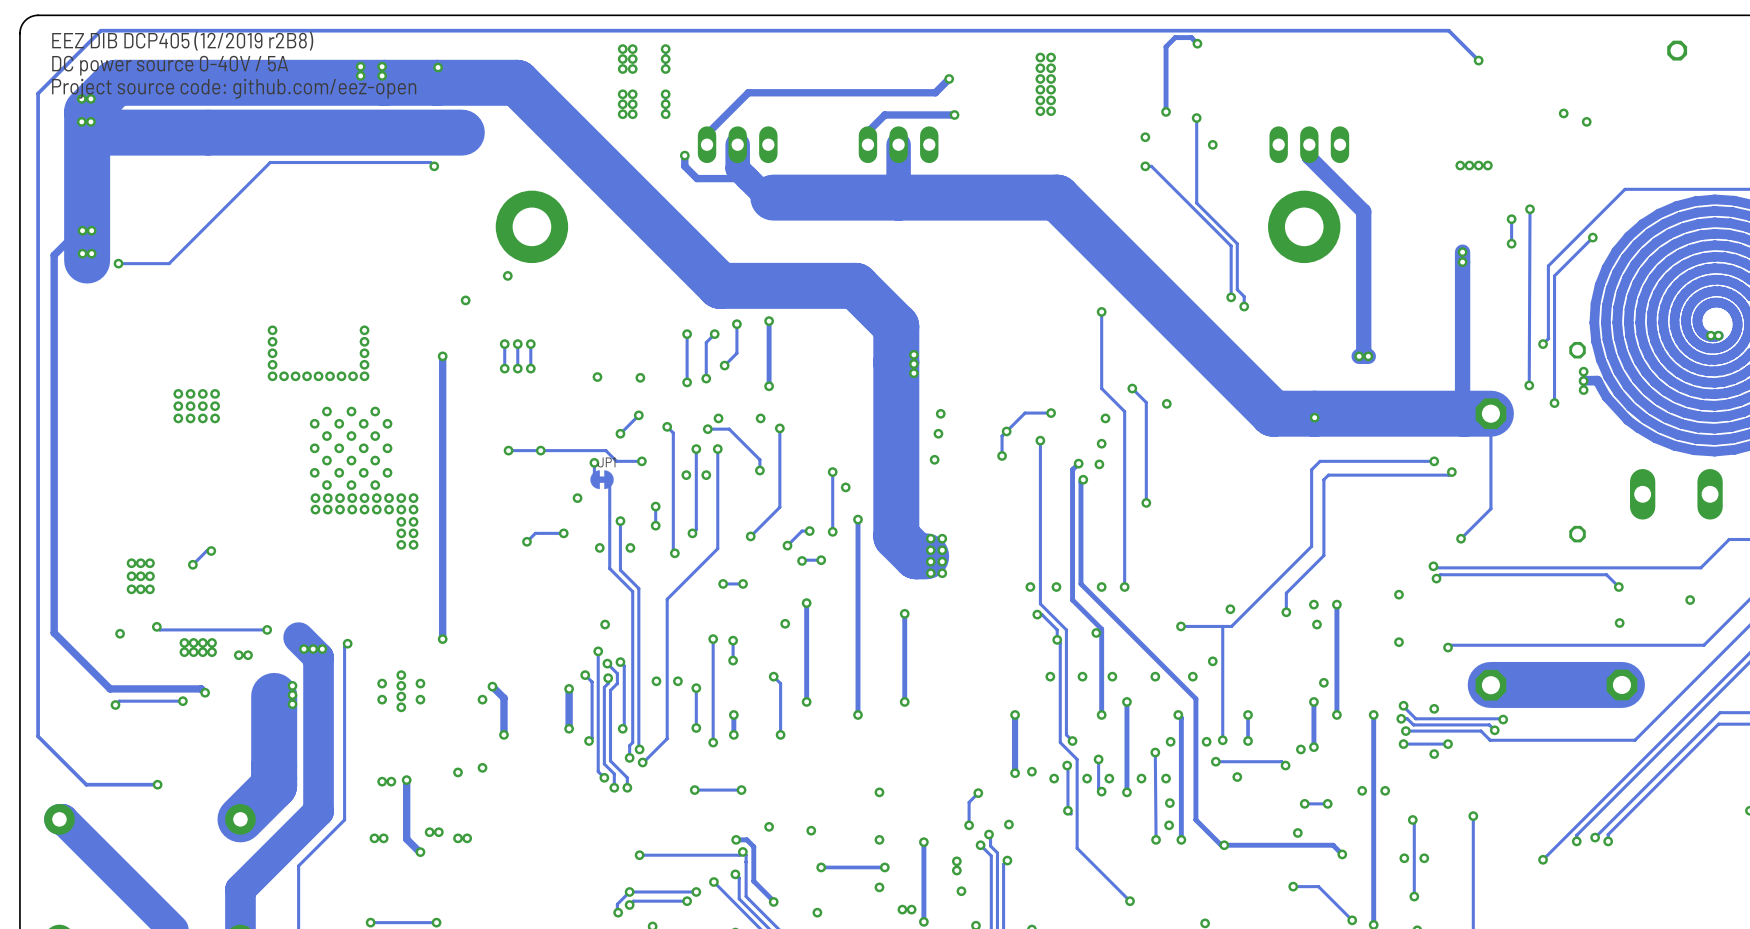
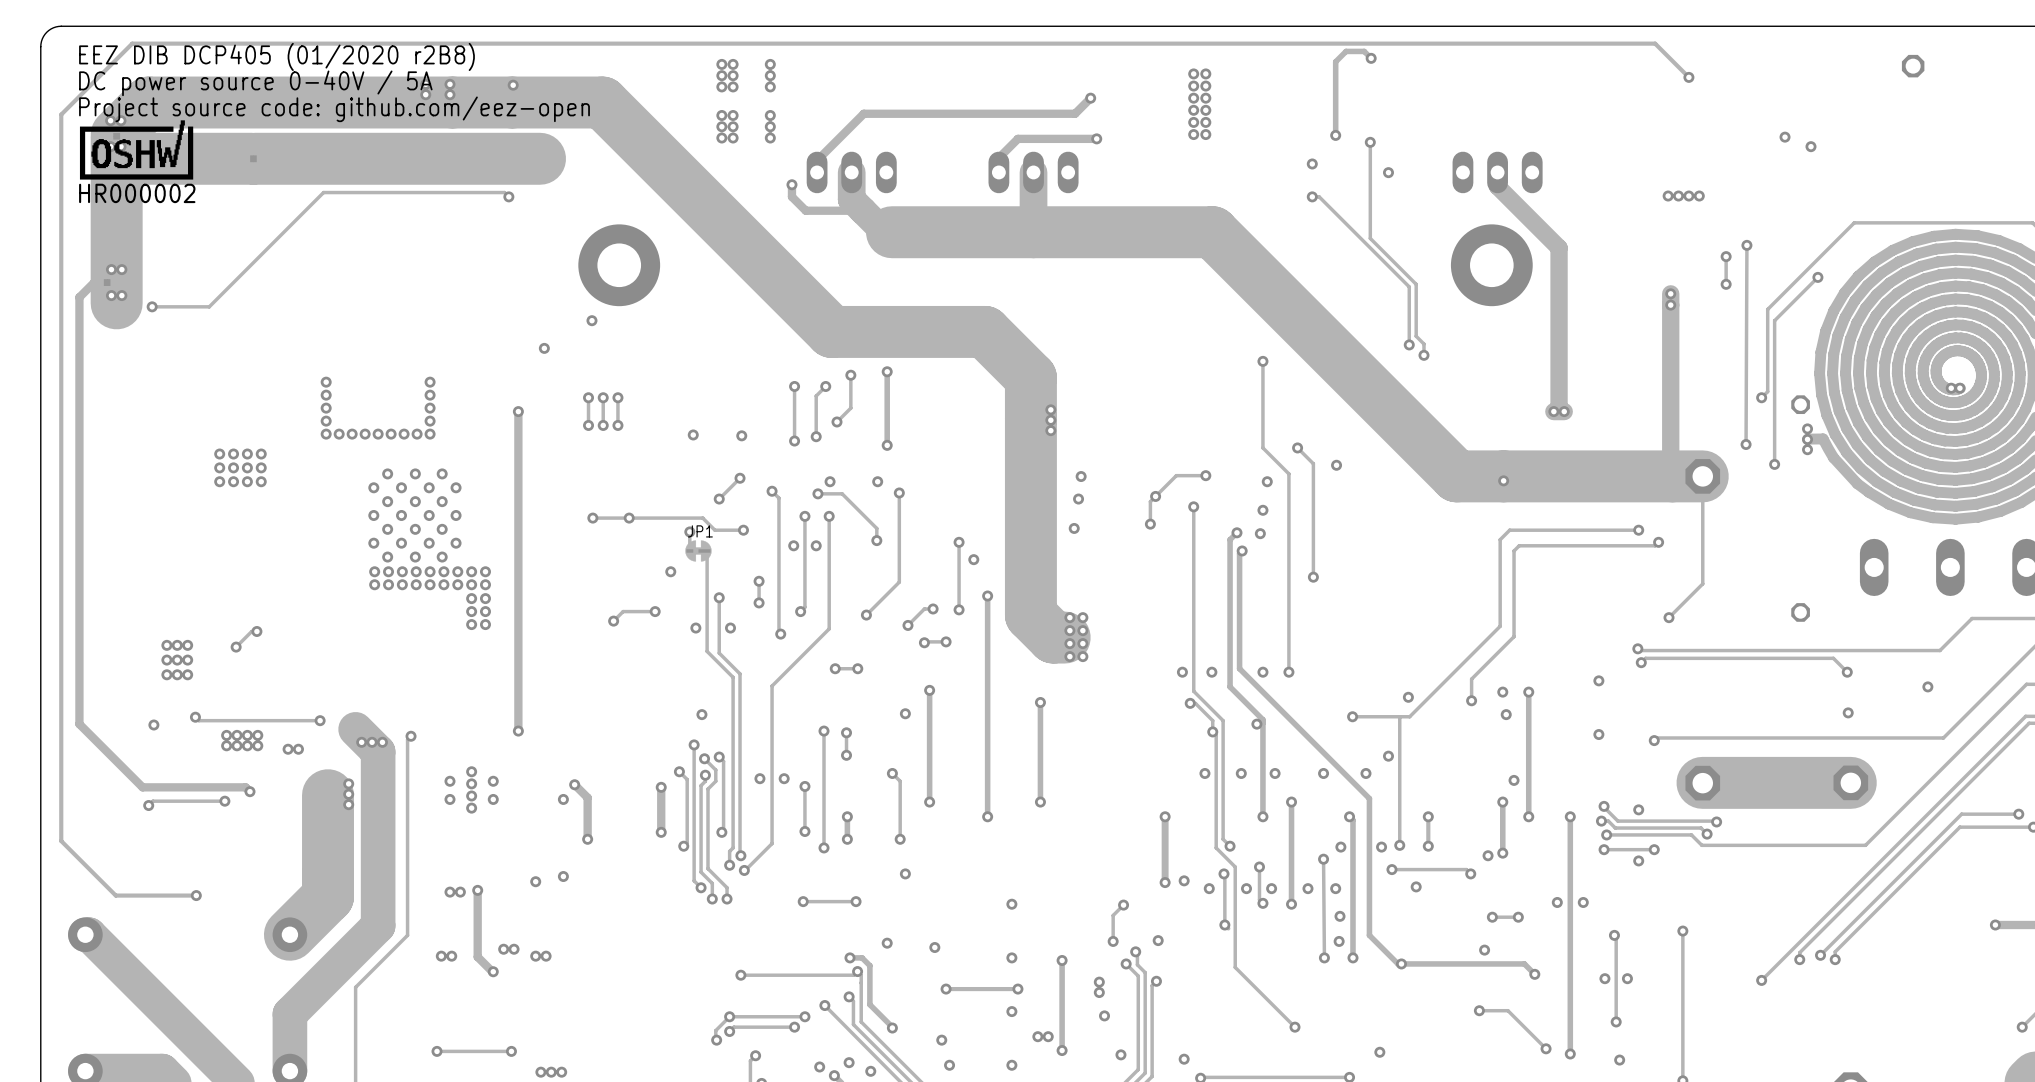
text: EEZ DIB DCP405 (12/2019 r2B8) (182, 41) -> EEZ DIB DCP405 (01/2020 r2B8) (276, 56)
drawing: none -> [79, 120, 194, 180]
via: none -> (905, 873)

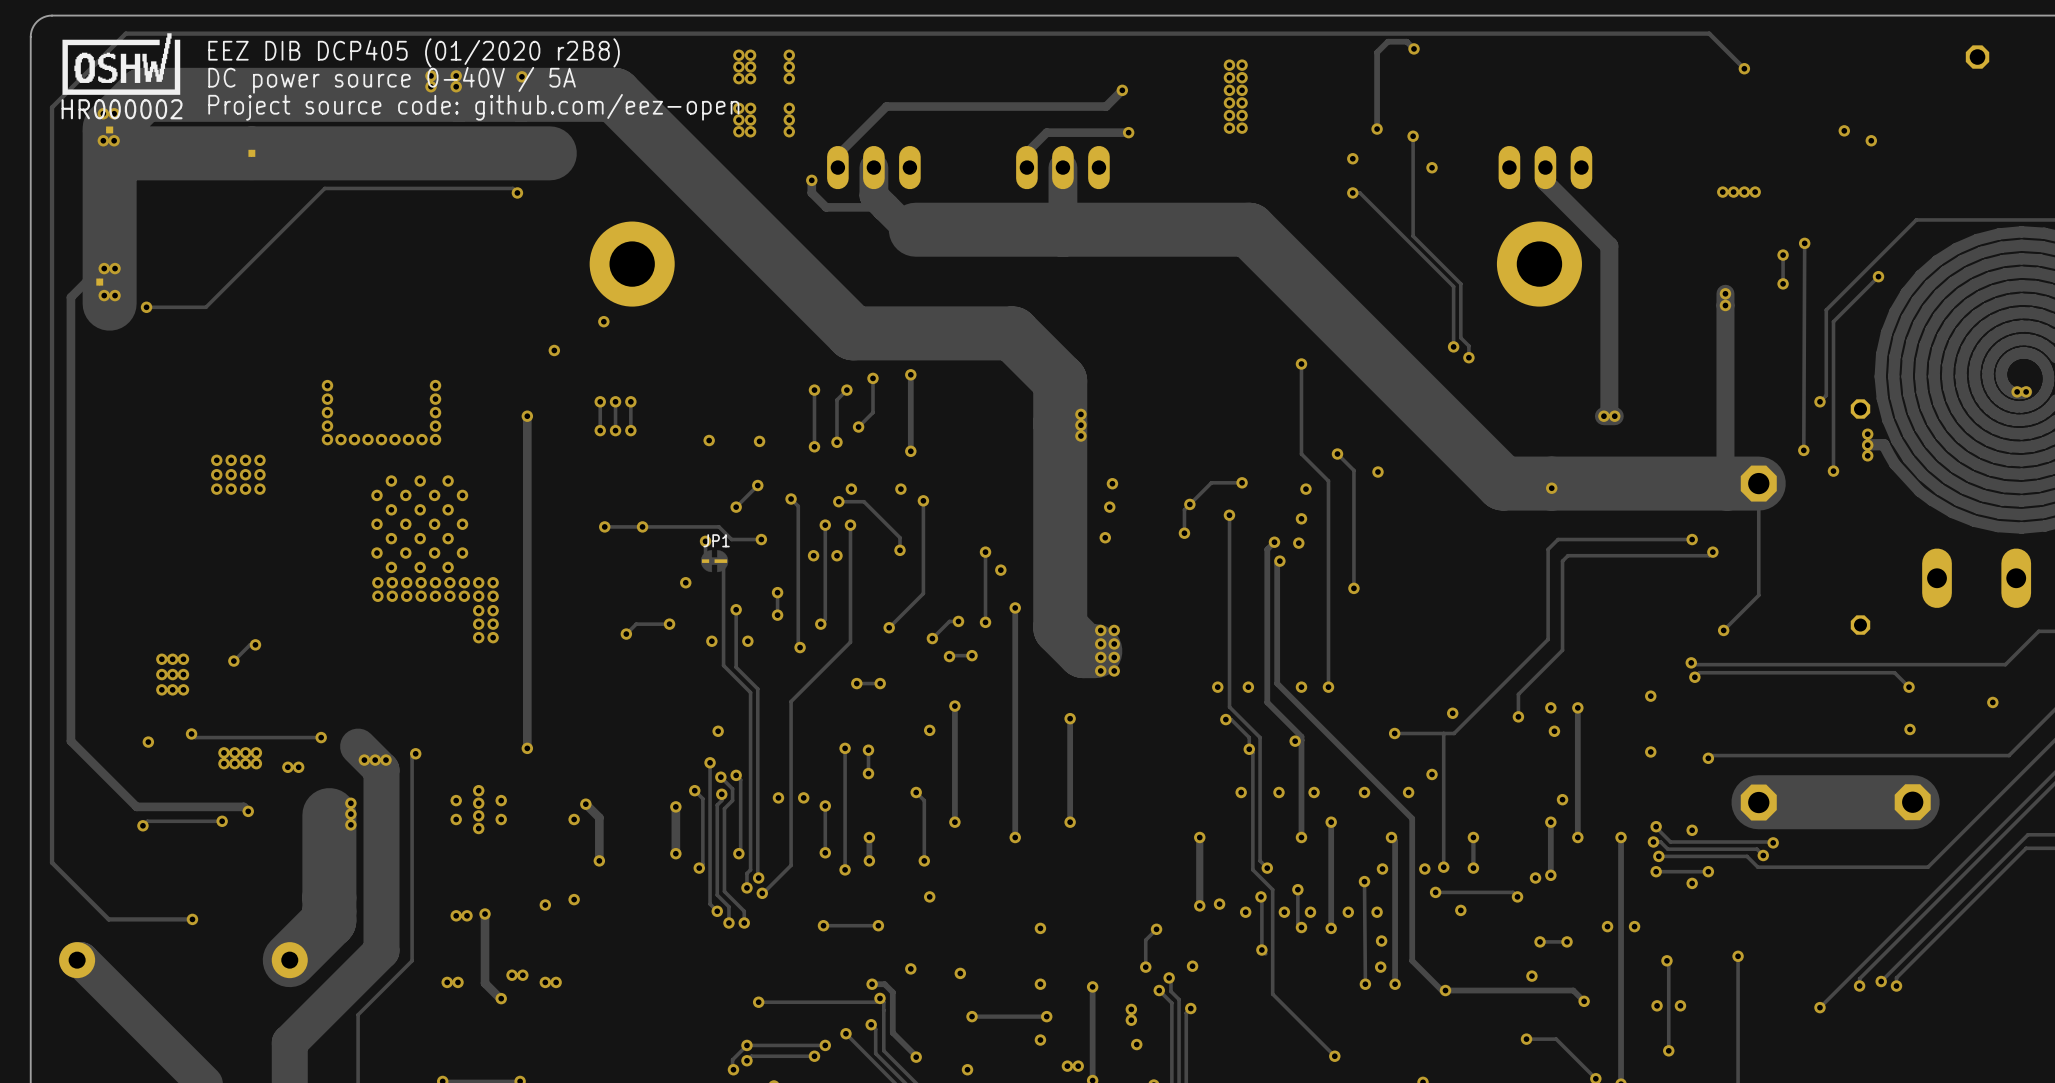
text position: EEZ DIB DCP405 (01/2020 r2B8) (276, 56) -> EEZ DIB DCP405 (01/2020 r2B8) (414, 52)
text position: DC power source 0-40V / 5A (255, 83) -> DC power source 0-40V / 5A (392, 80)
text position: Project source code: github.com/eez-open (334, 109) -> Project source code: github.com/eez-open (473, 107)
drawing position: (136, 149) -> (121, 64)

